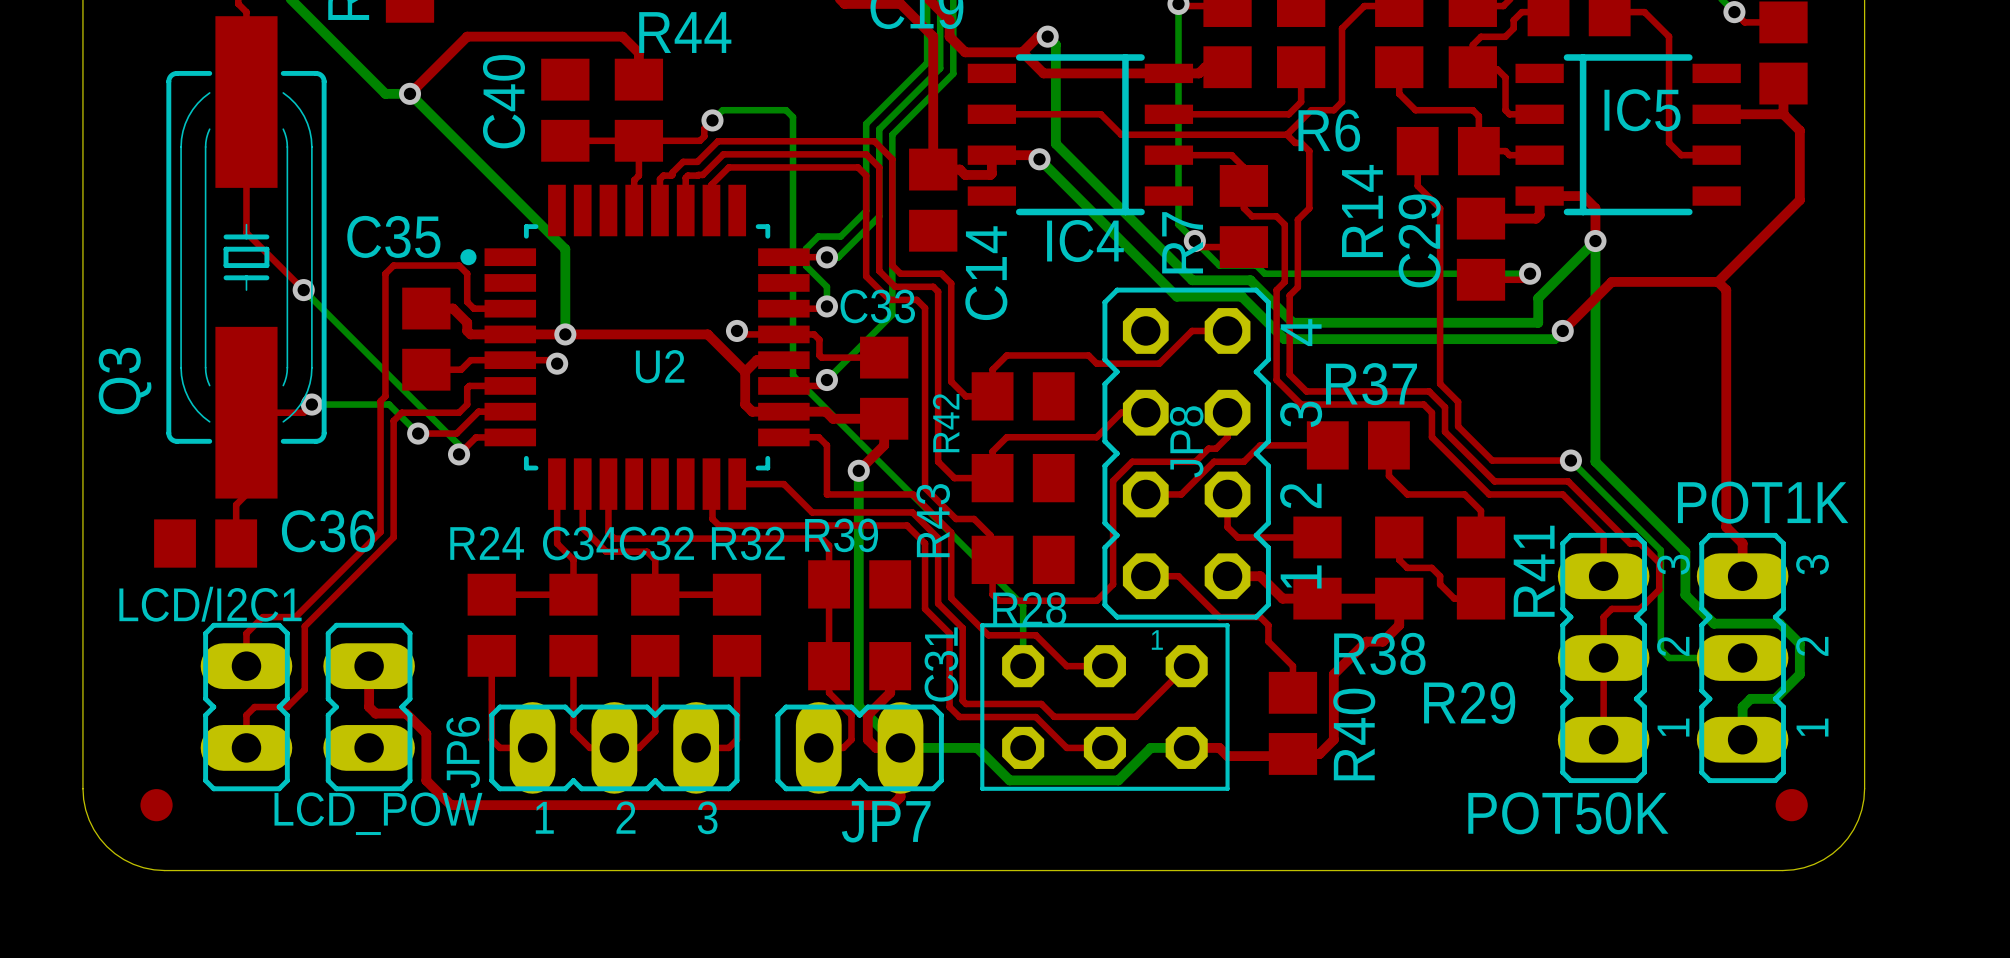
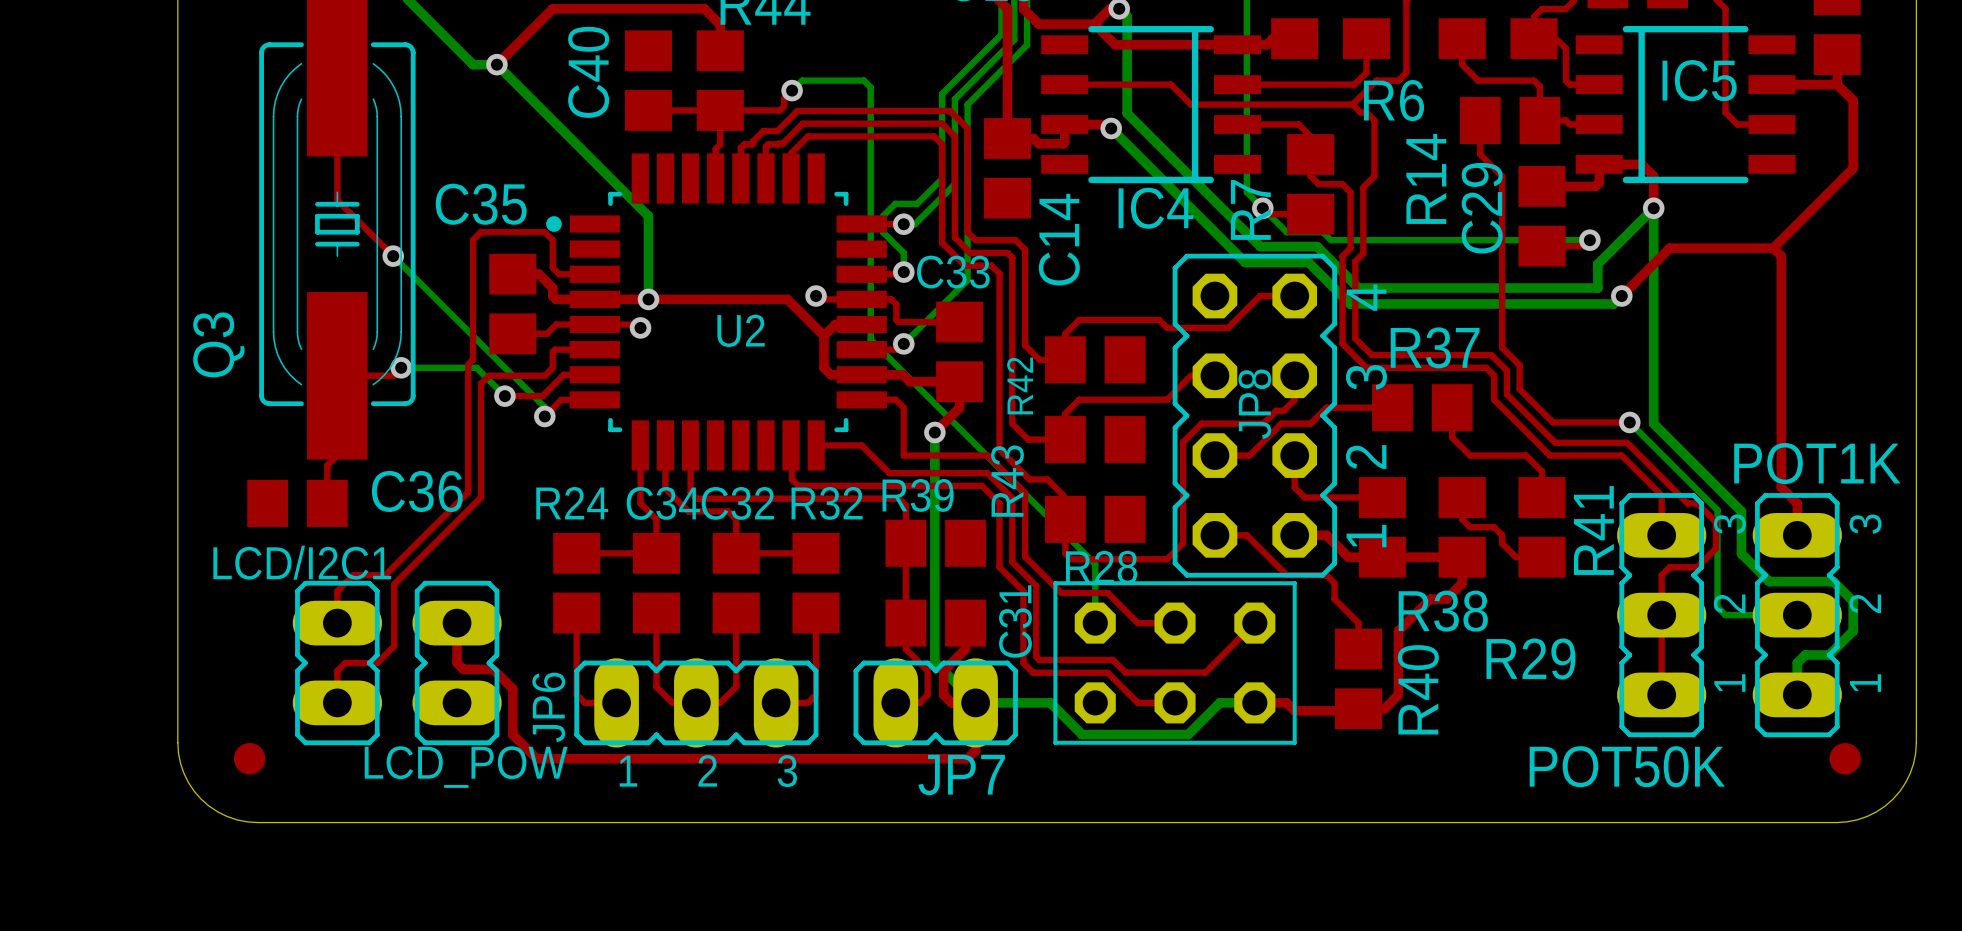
text: 1 (1157, 639) -> none

